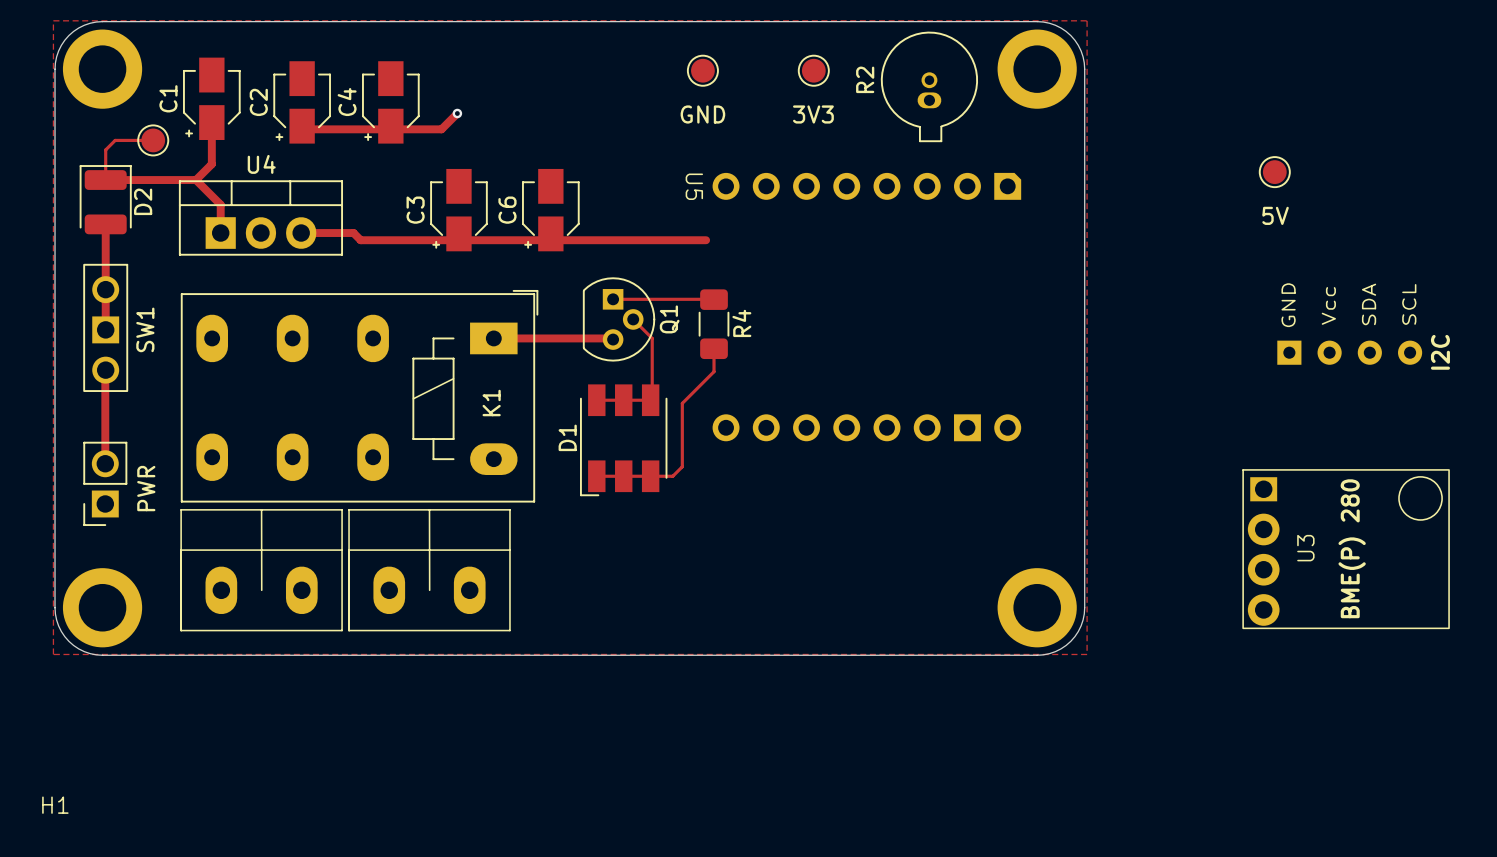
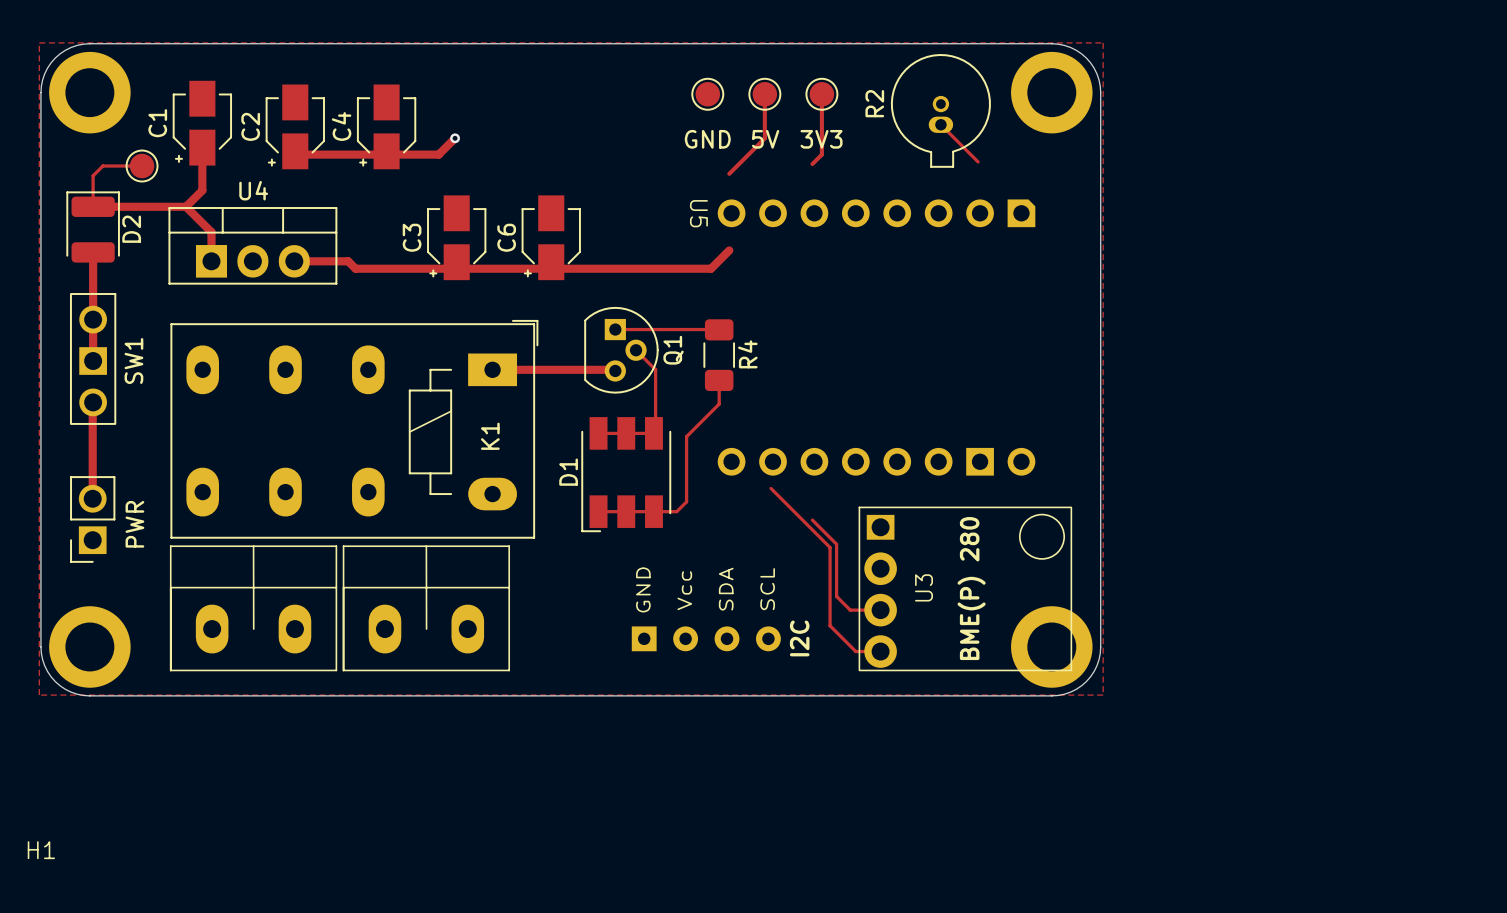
track: none -> (764, 94) (764, 138) (729, 173)
track: none -> (821, 94) (821, 154) (812, 164)
track: none -> (940, 124) (978, 161)
5V position: (1274, 172) -> (764, 94)
track: none -> (729, 250) (711, 268)
part: (1349, 352) -> none
track: none -> (771, 488) (830, 547) (830, 625) (855, 651) (880, 651)
track: none -> (812, 520) (836, 544) (836, 596) (850, 610) (880, 610)
U3 position: (1346, 549) -> (965, 588)
part: none -> (706, 638)

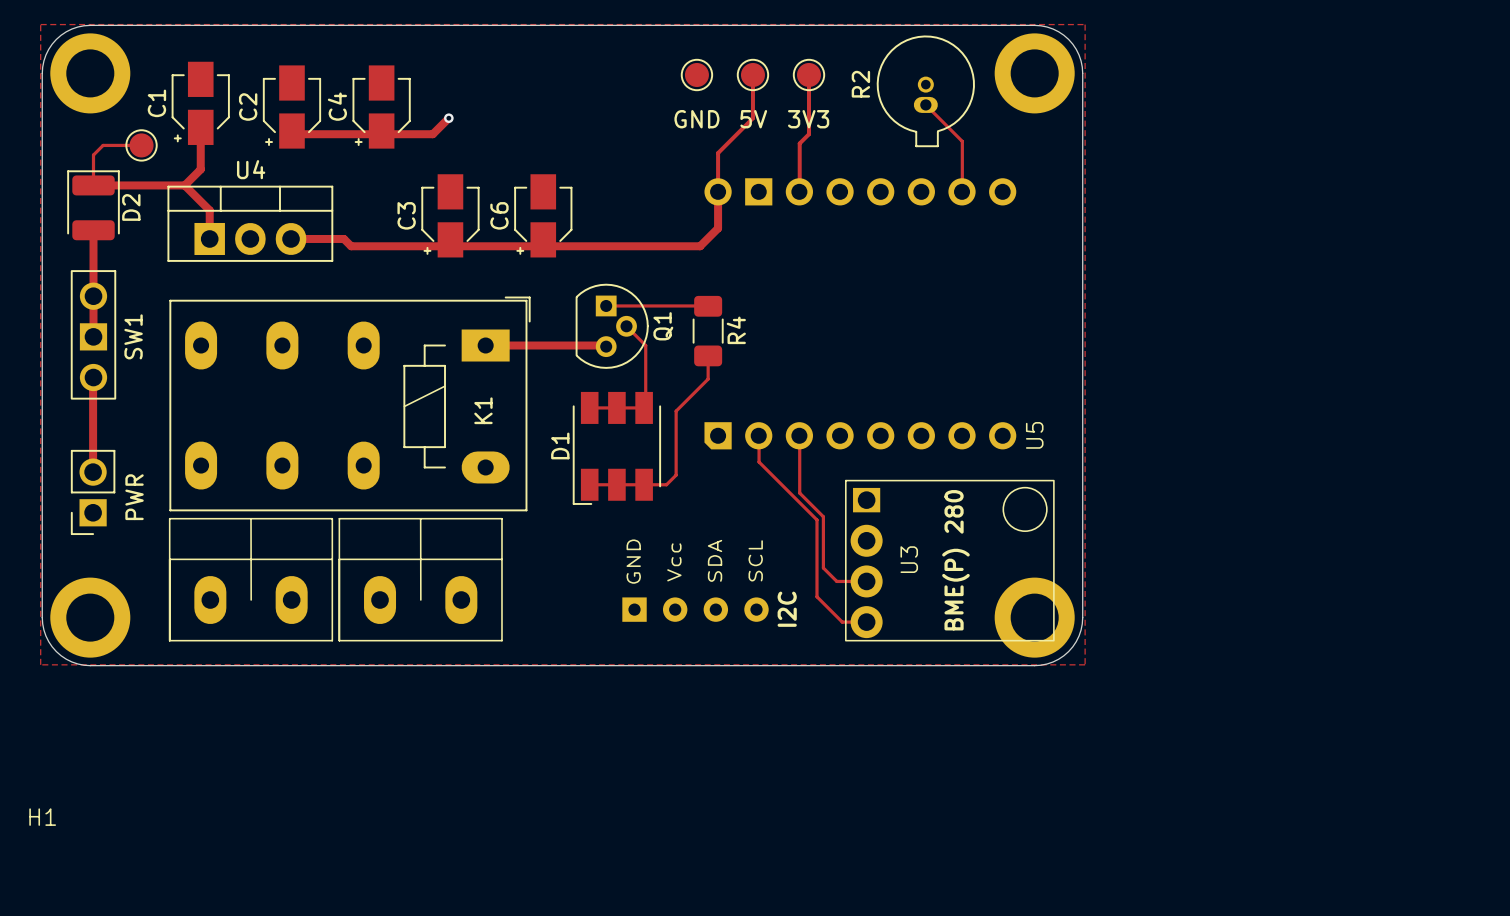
track: none -> (962, 141) (962, 191)
track: none -> (799, 143) (799, 191)
track: none -> (718, 153) (718, 228)
U5 rotation: 0° (876, 337) -> 180° (860, 313)
track: none -> (759, 435) (759, 462)
track: none -> (799, 435) (799, 493)

